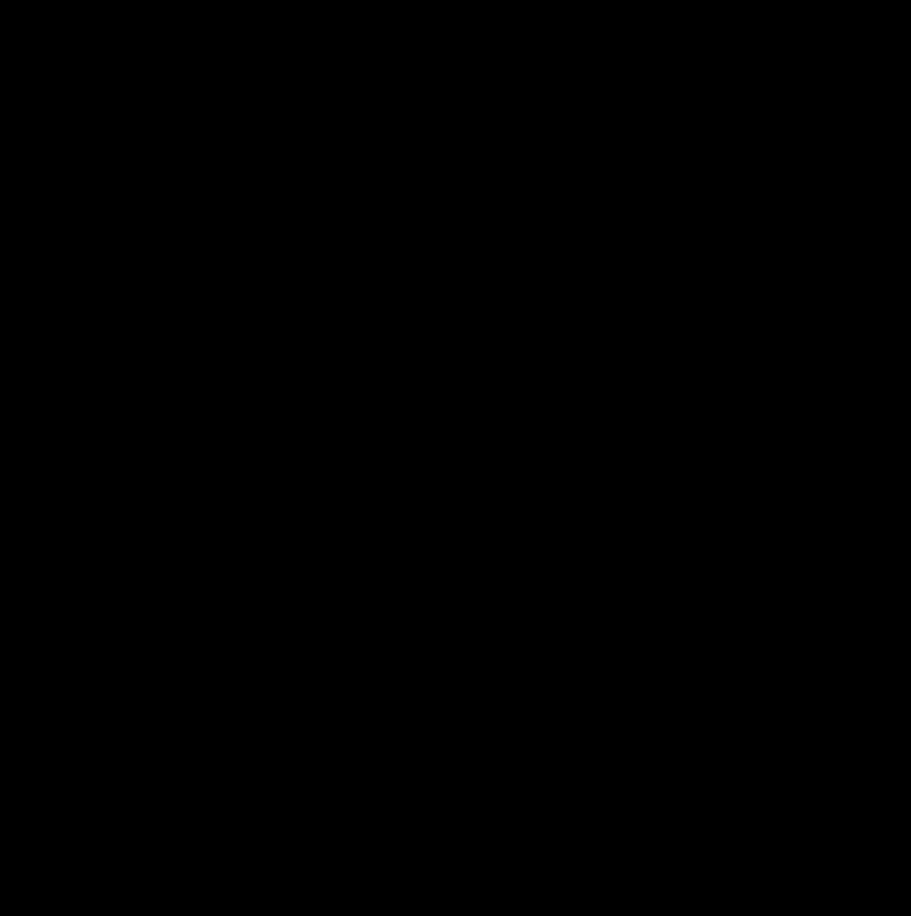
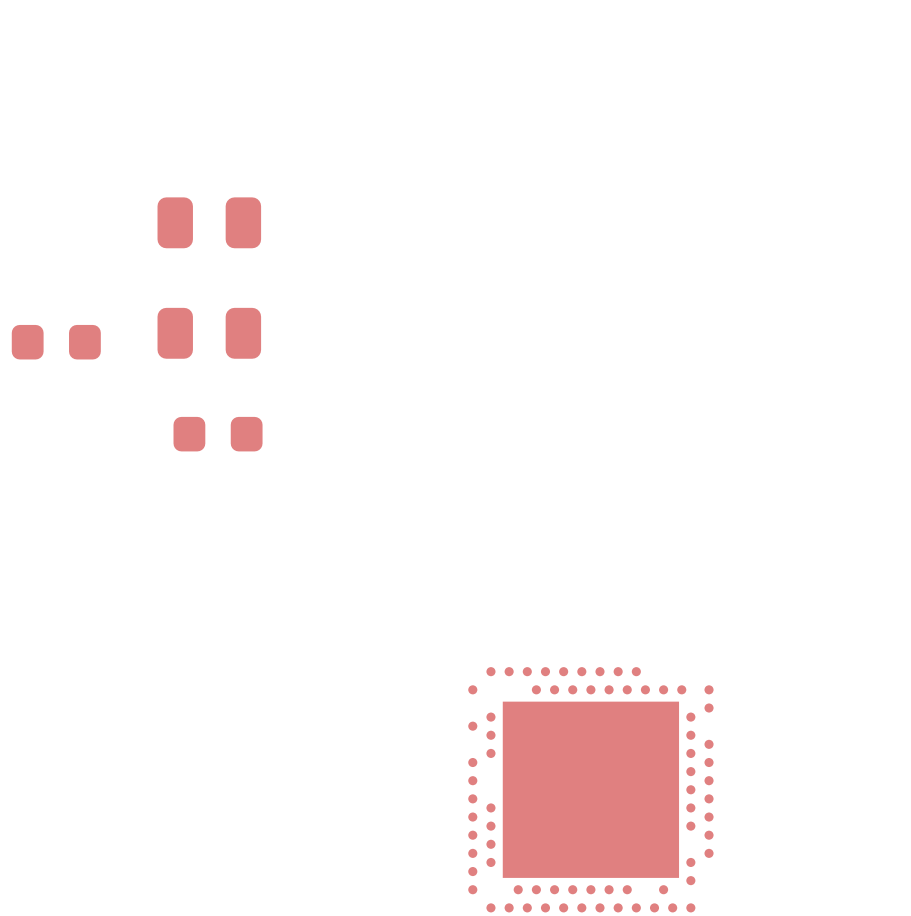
part: none -> (209, 222)
part: none -> (209, 333)
part: none -> (56, 342)
part: none -> (218, 434)
part: none -> (590, 789)

